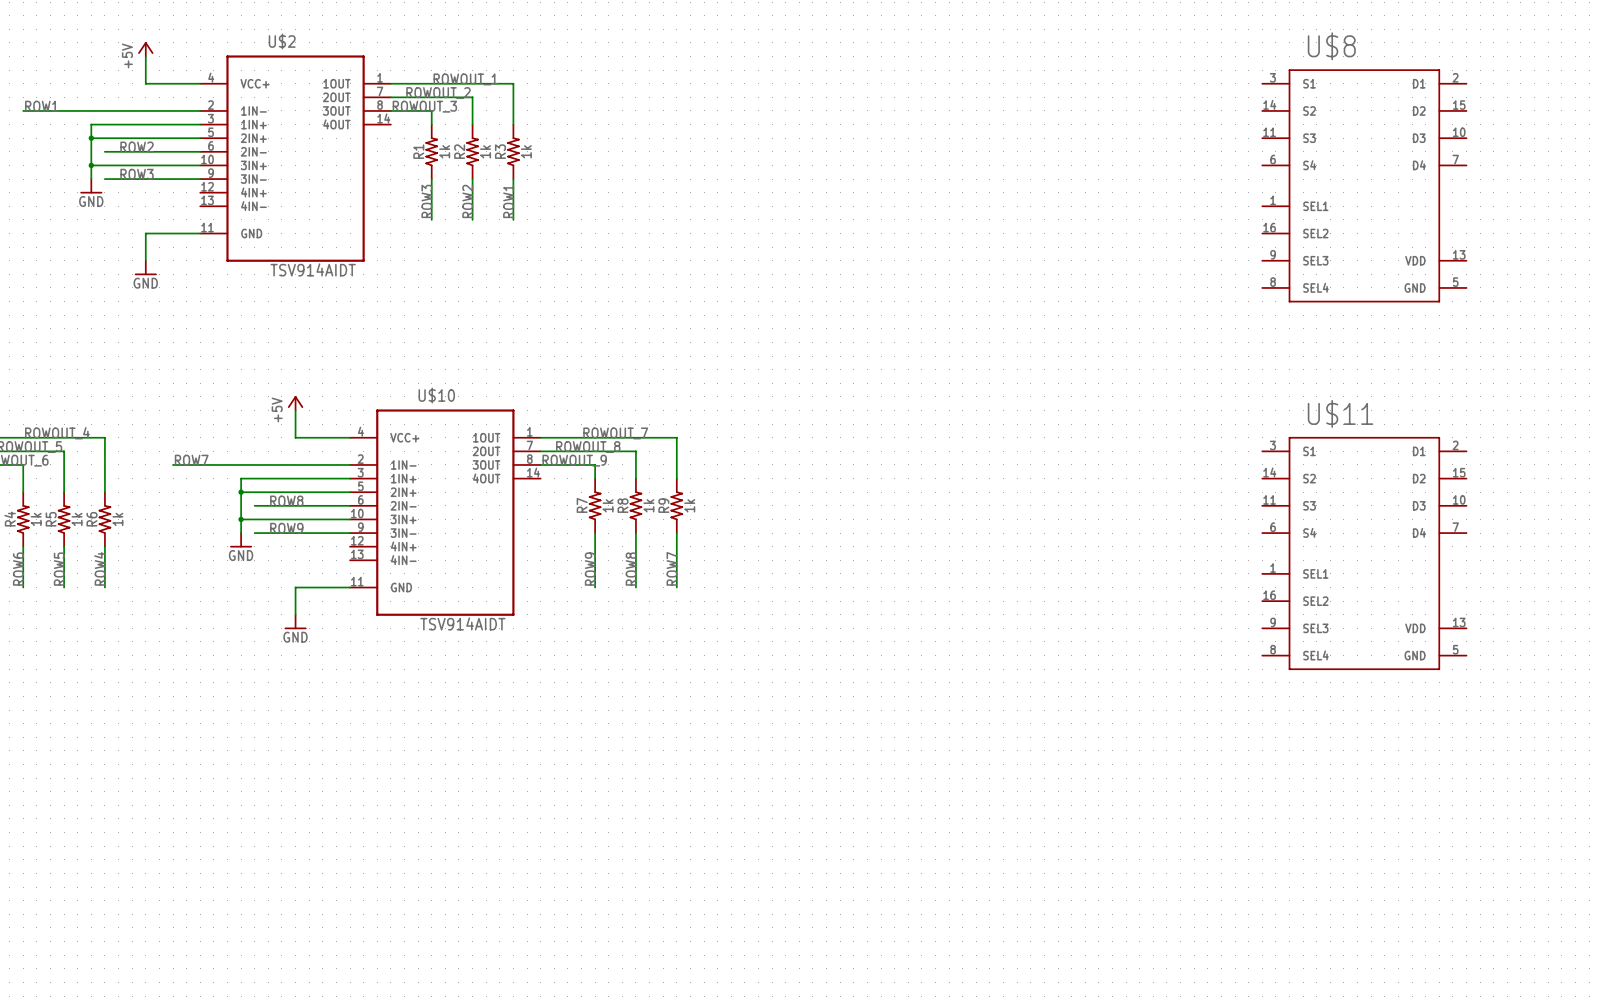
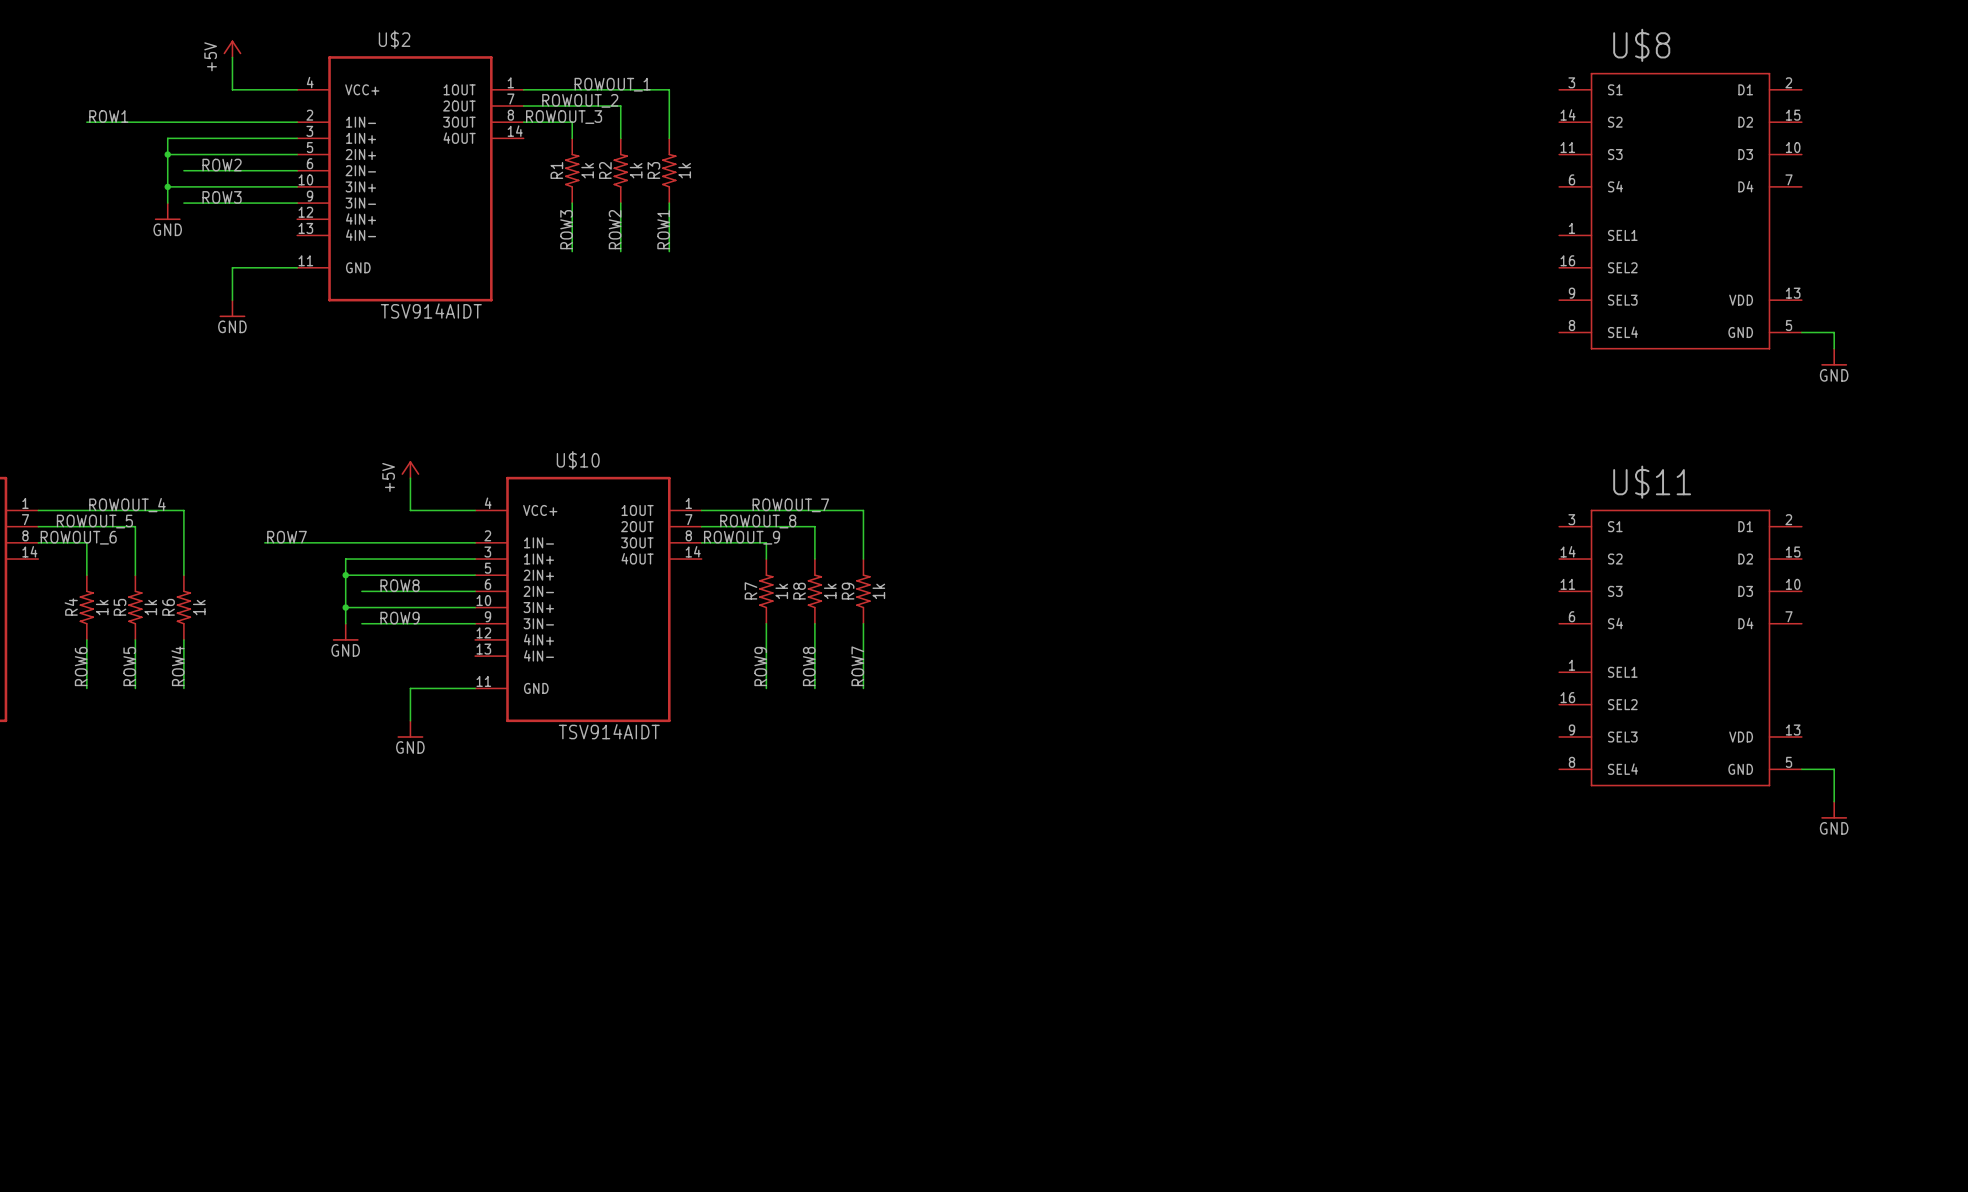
wire: none -> (1801, 332) (1834, 332) (1834, 348)
power symbol: none -> GND (1834, 357)
wire: none -> (1801, 769) (1834, 769) (1834, 801)
power symbol: none -> GND (1834, 810)

